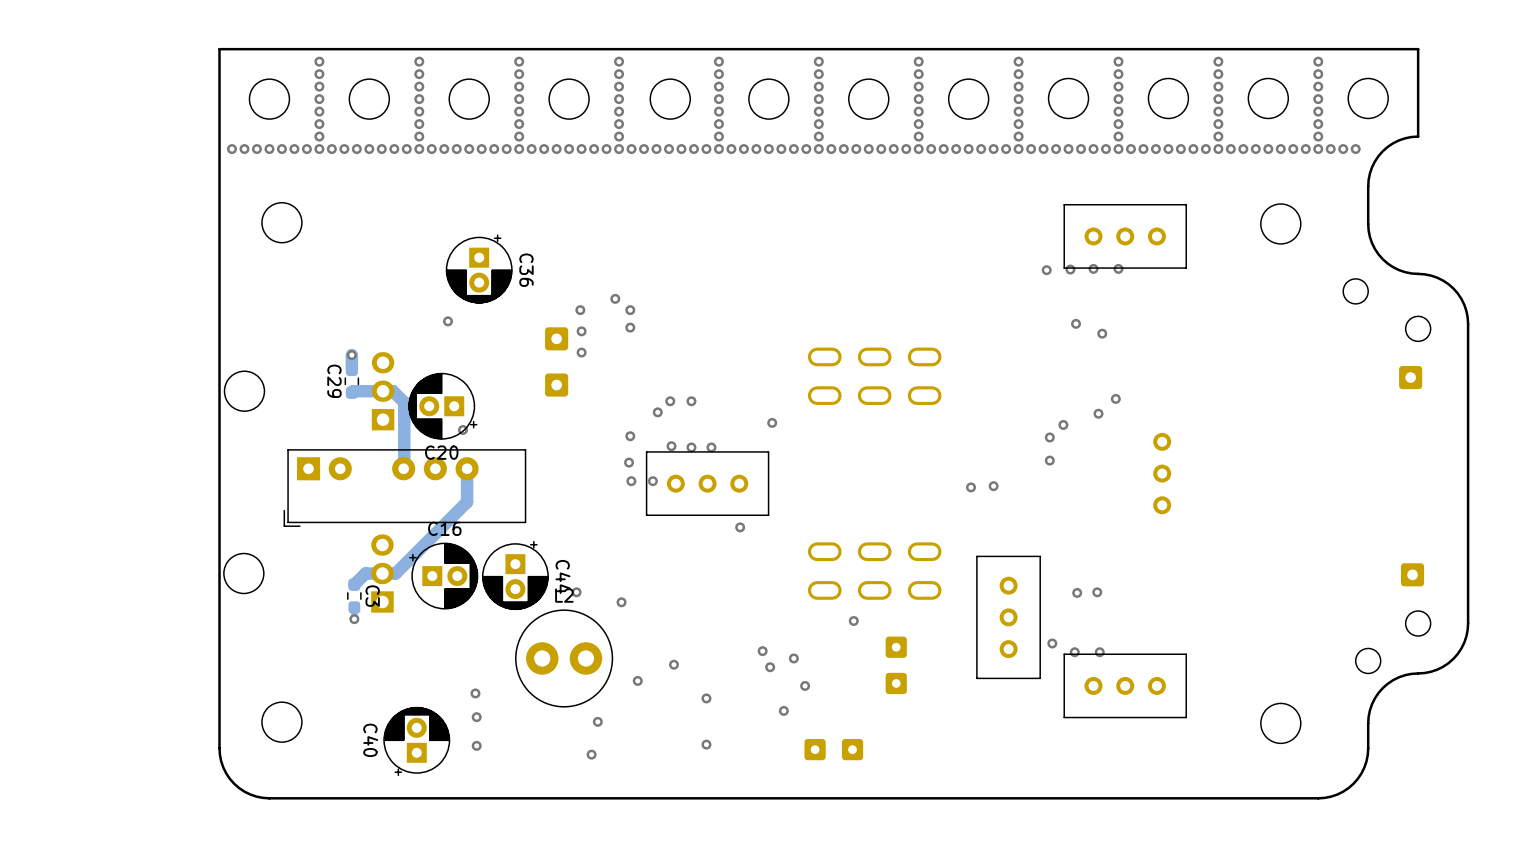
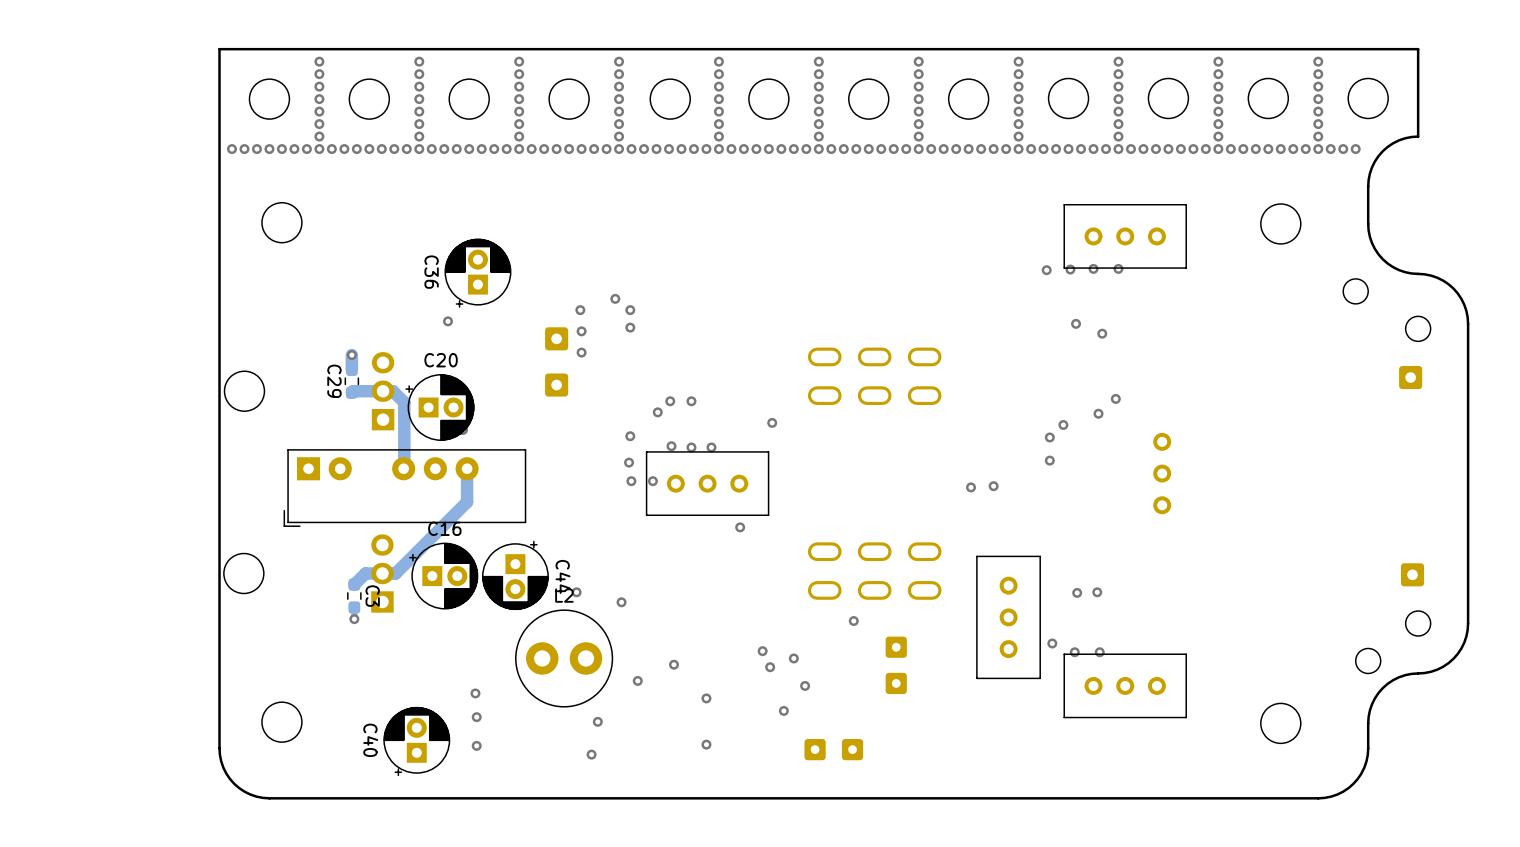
C36 rotation: 0° (479, 269) -> 180° (477, 273)
C20 rotation: 0° (442, 406) -> 180° (439, 407)

